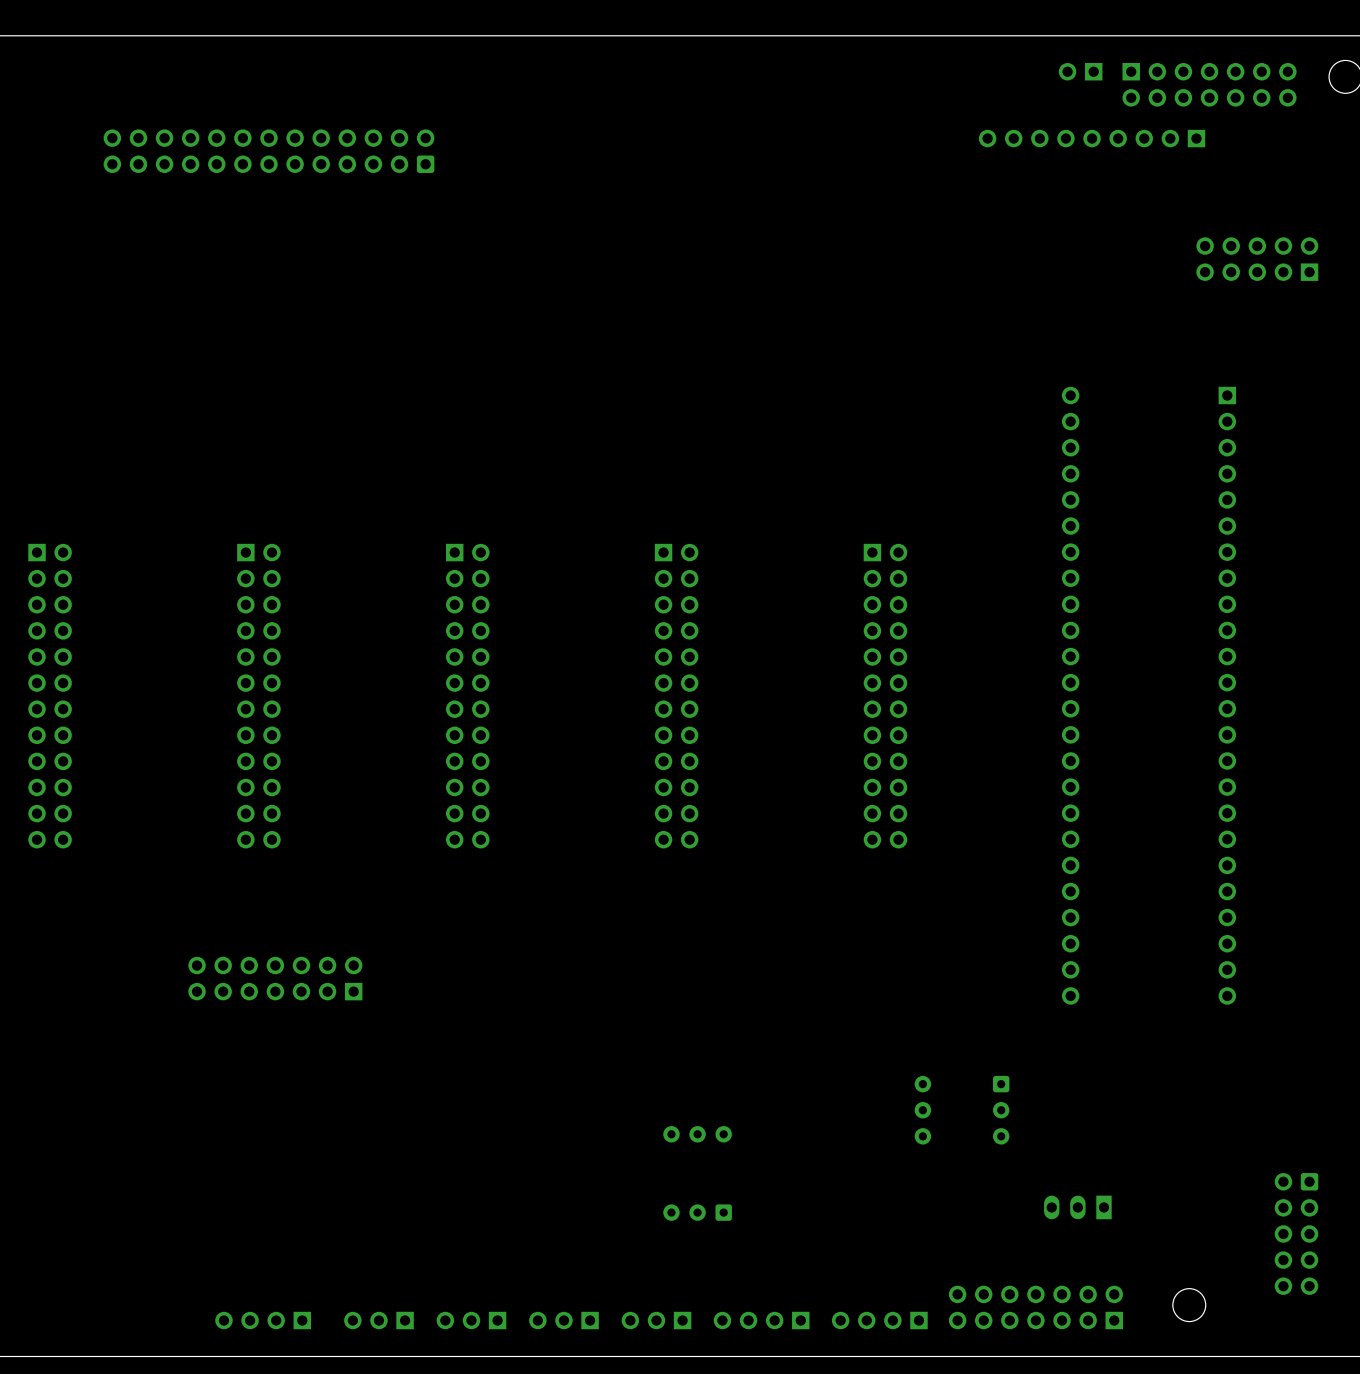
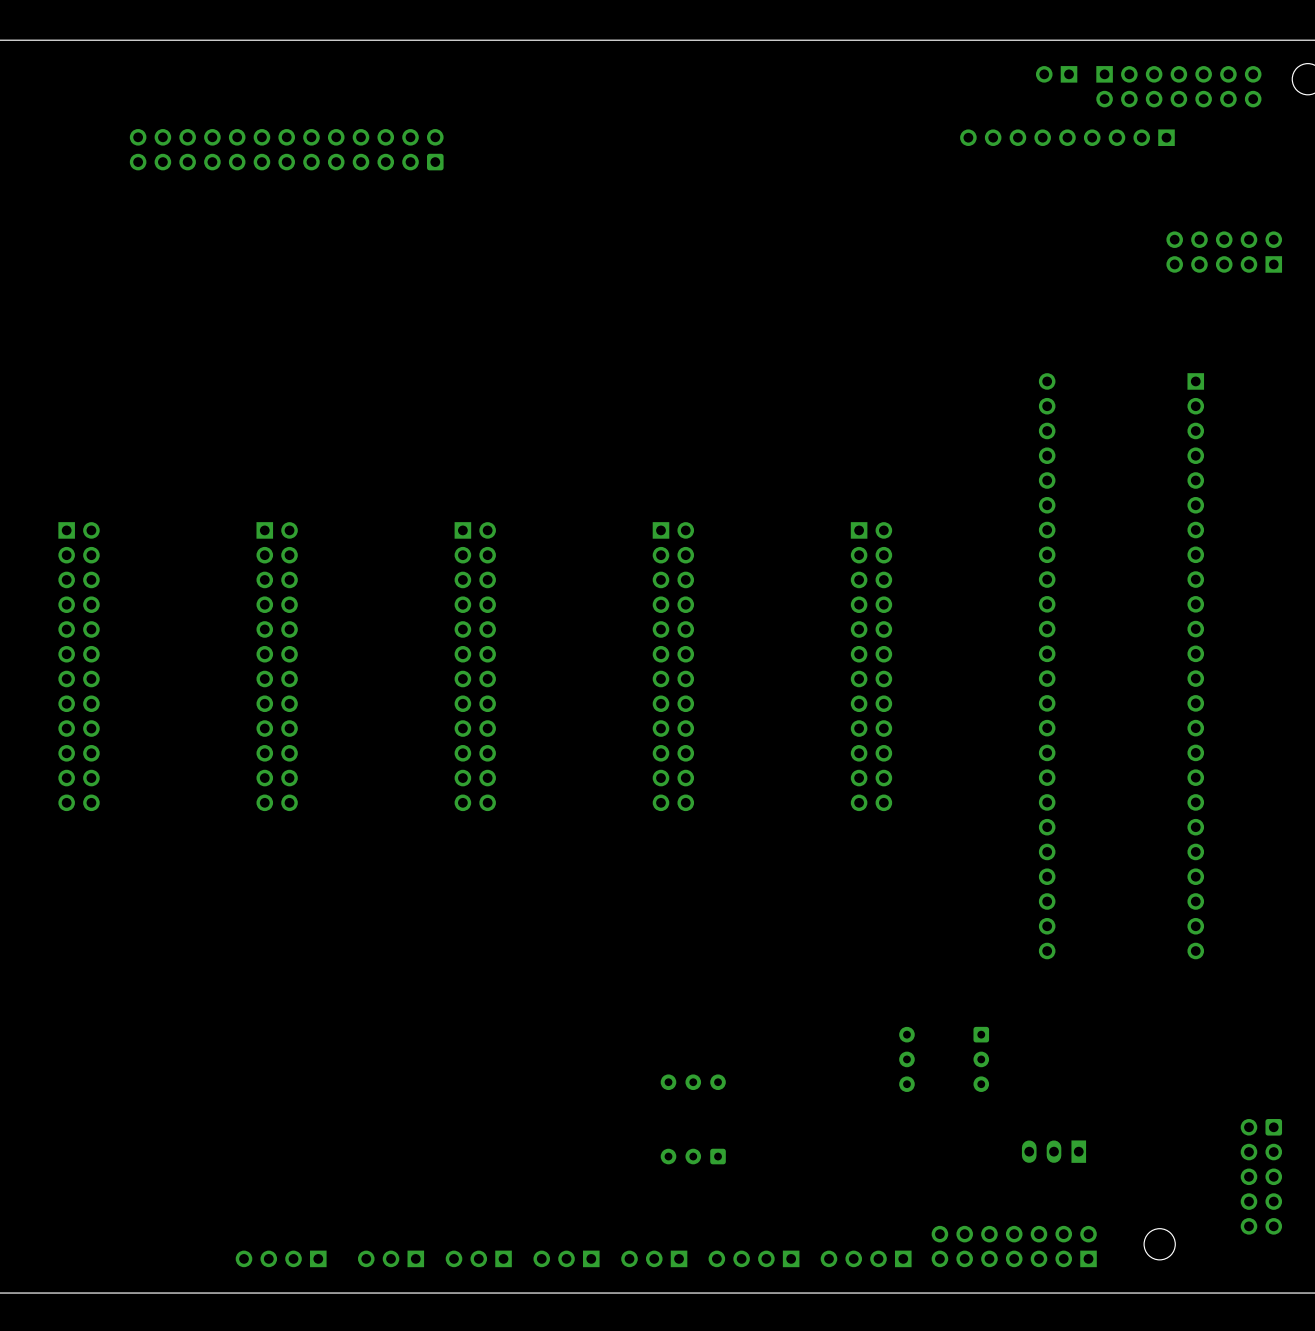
part: (275, 978) -> none

